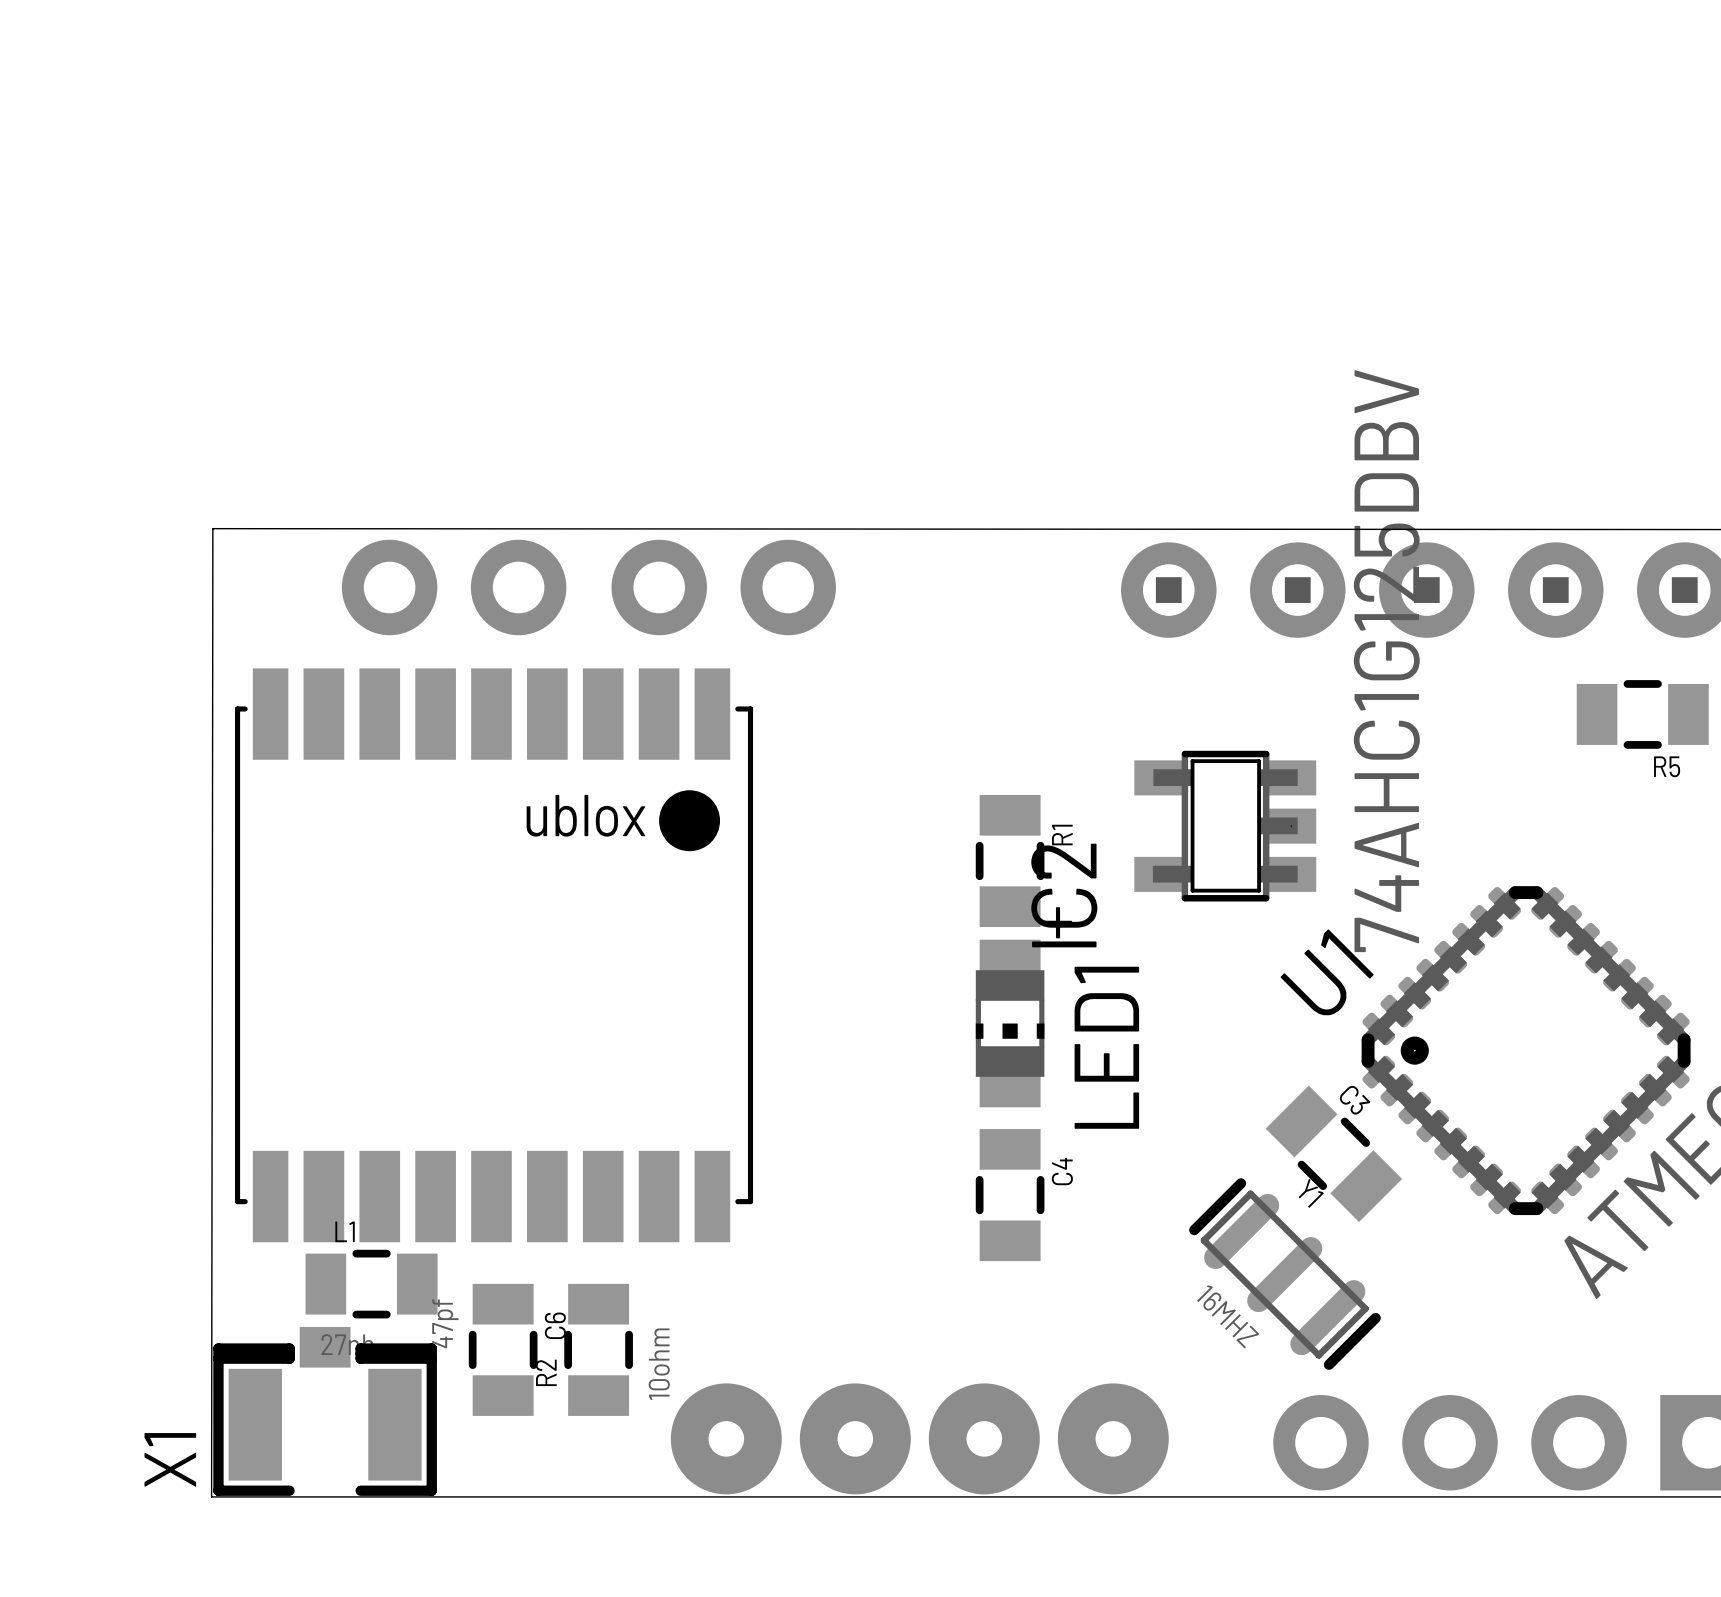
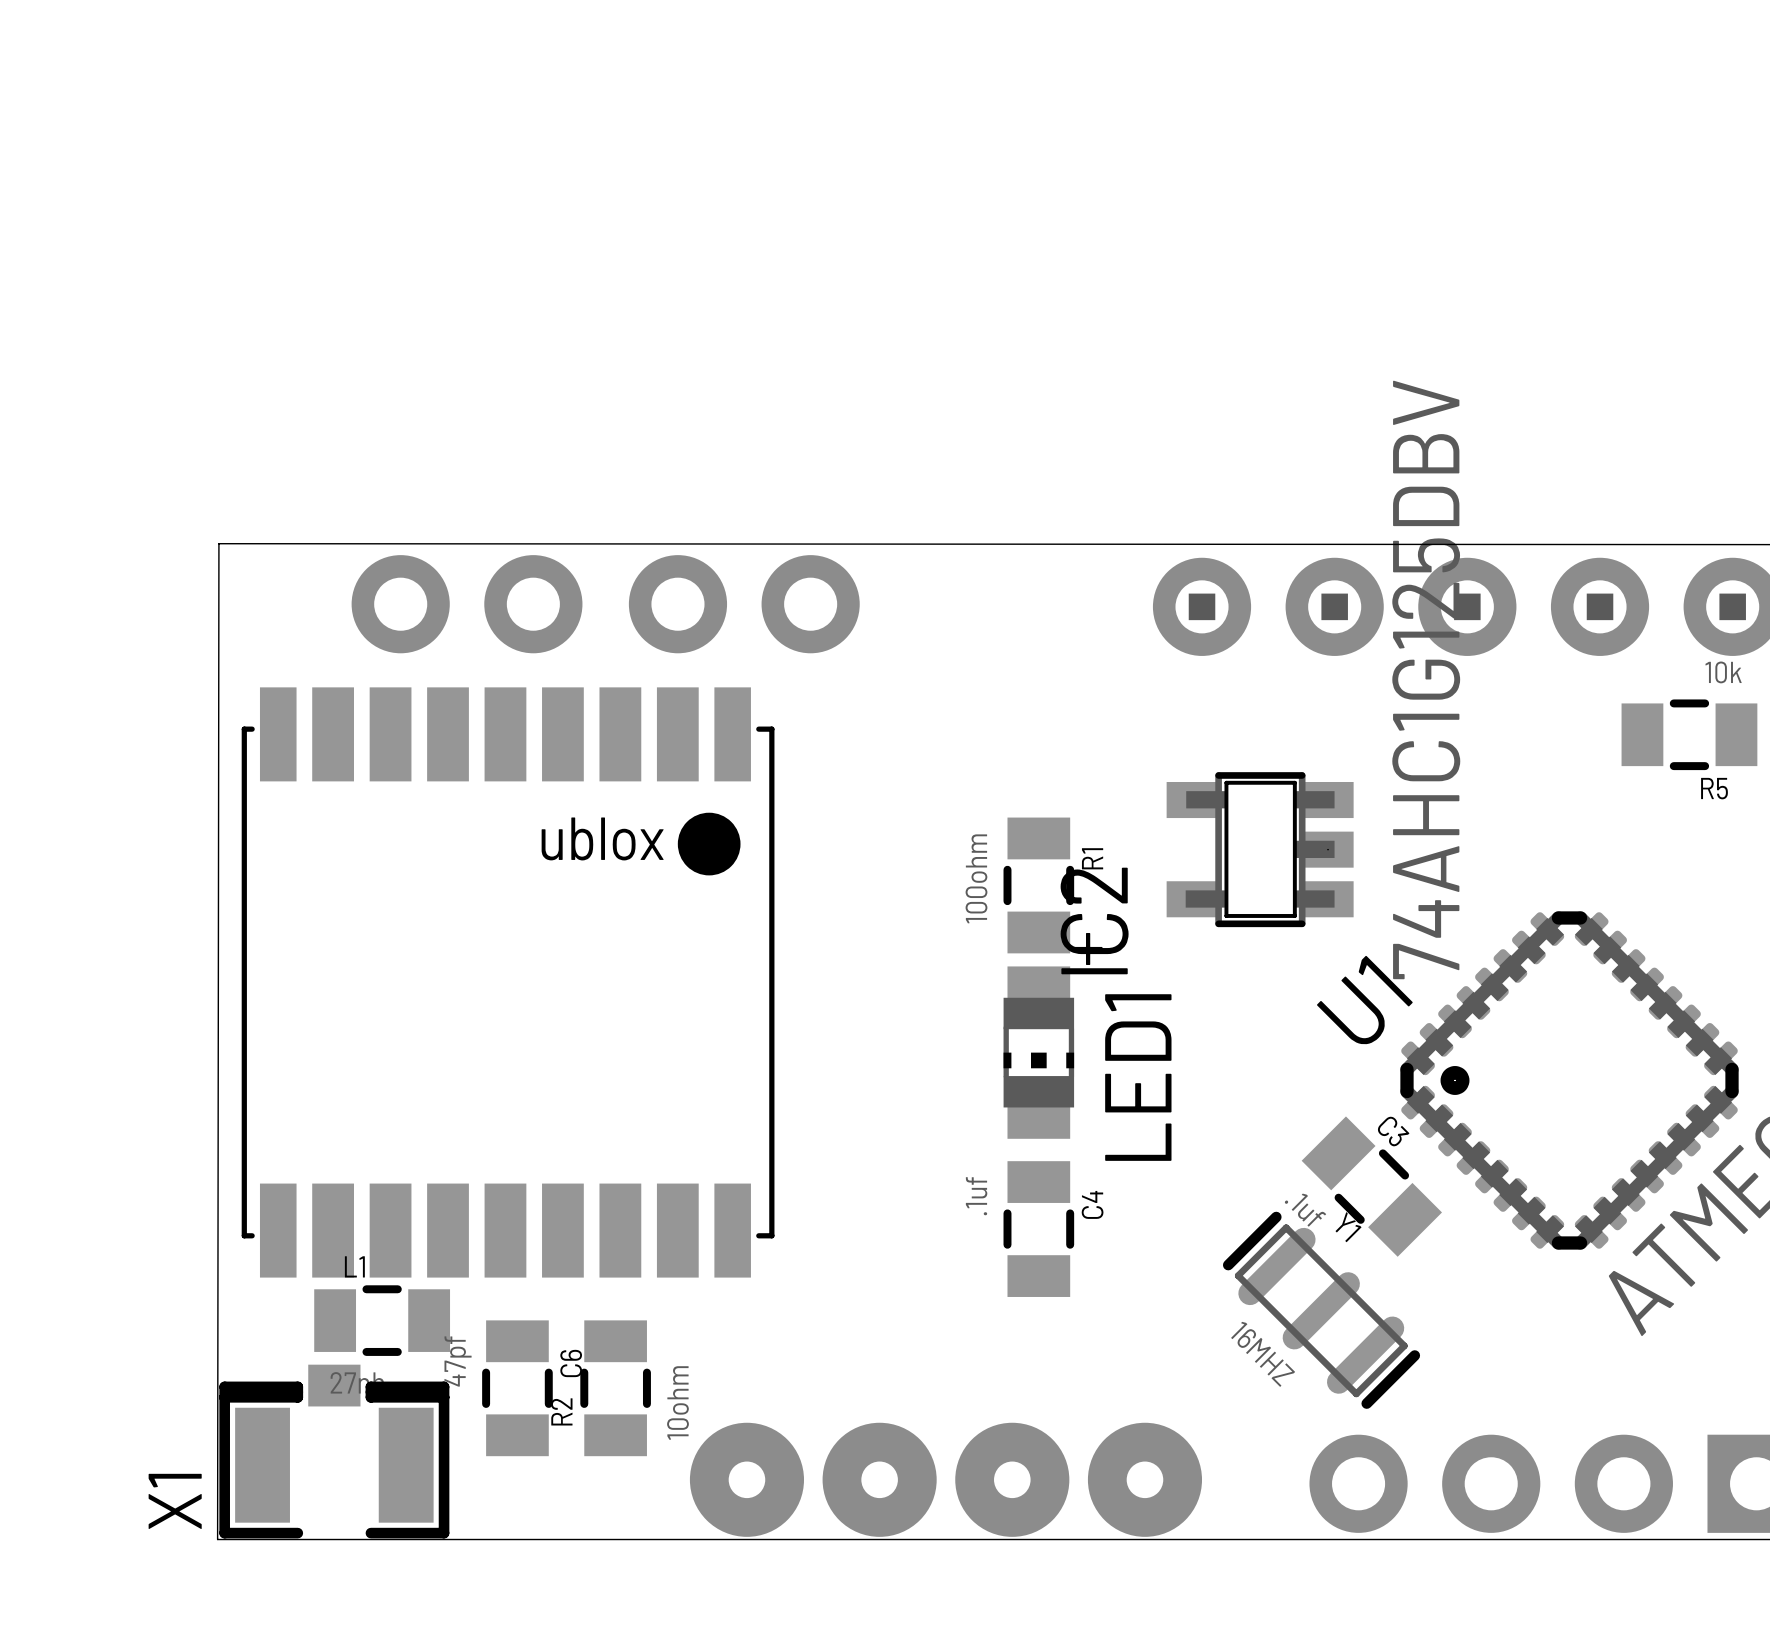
R5 value: none -> 10k (1723, 672)
R1 value: none -> 100ohm (976, 878)
C4 value: none -> .1uf (976, 1196)
C3 value: none -> .1uf (1305, 1210)

